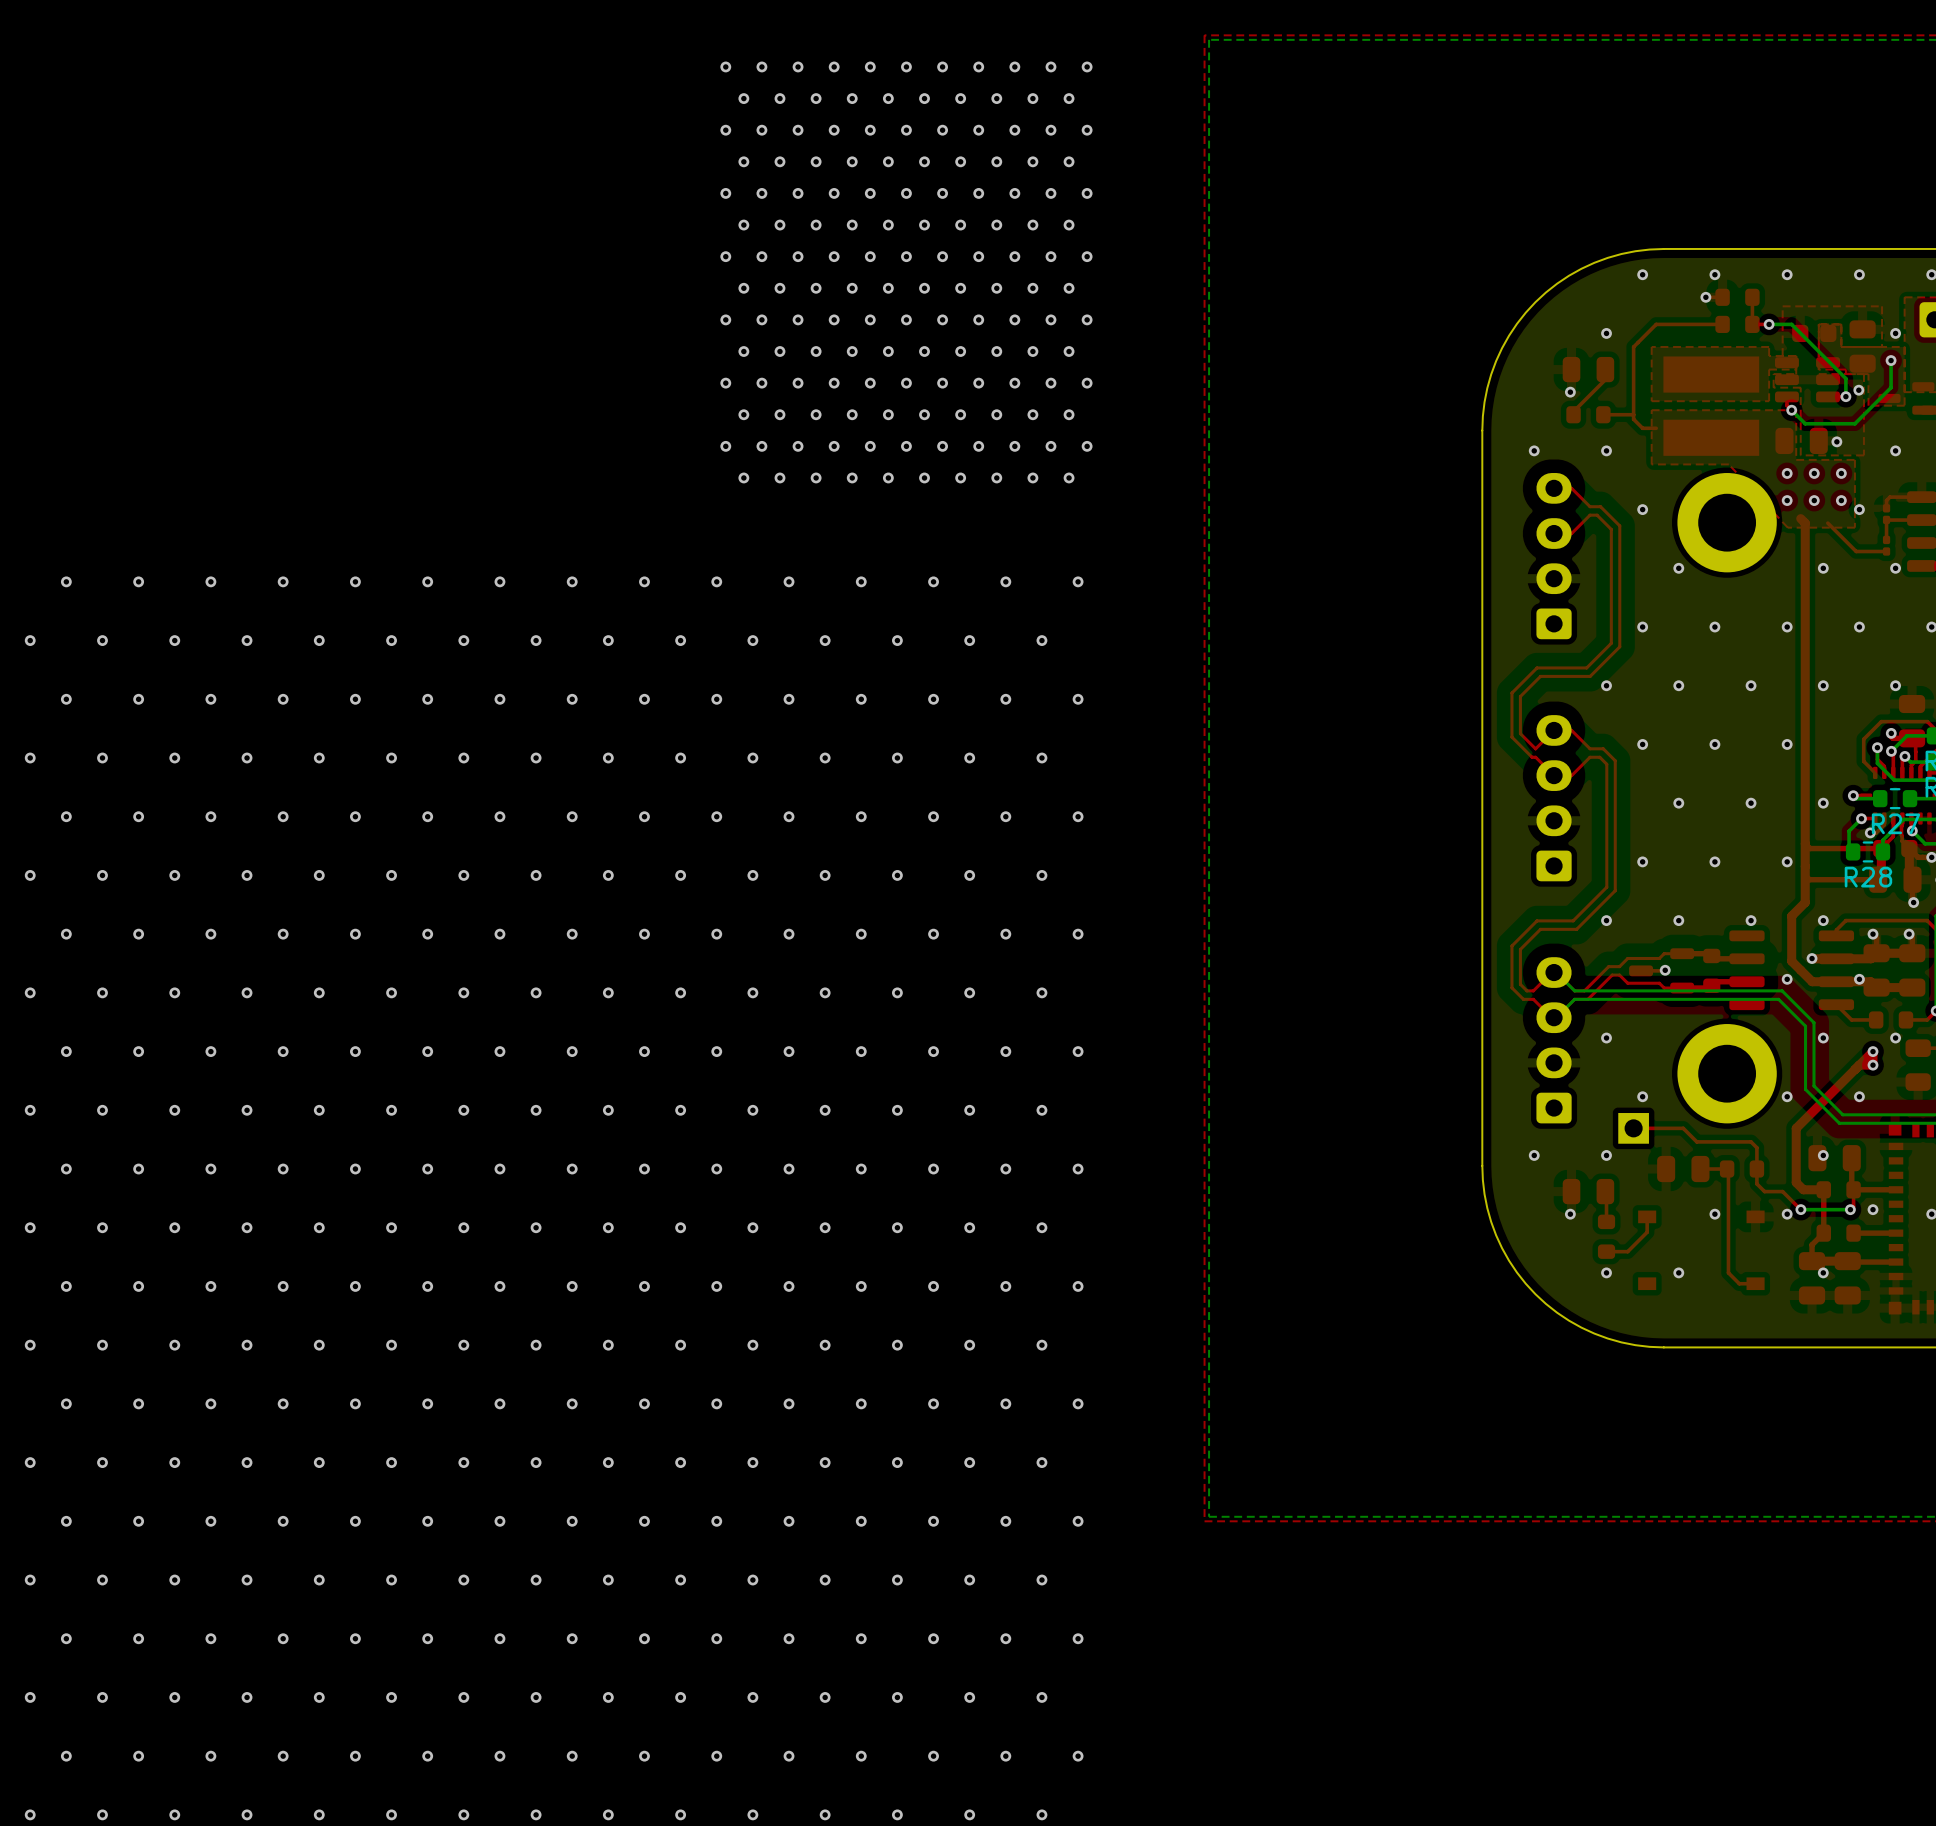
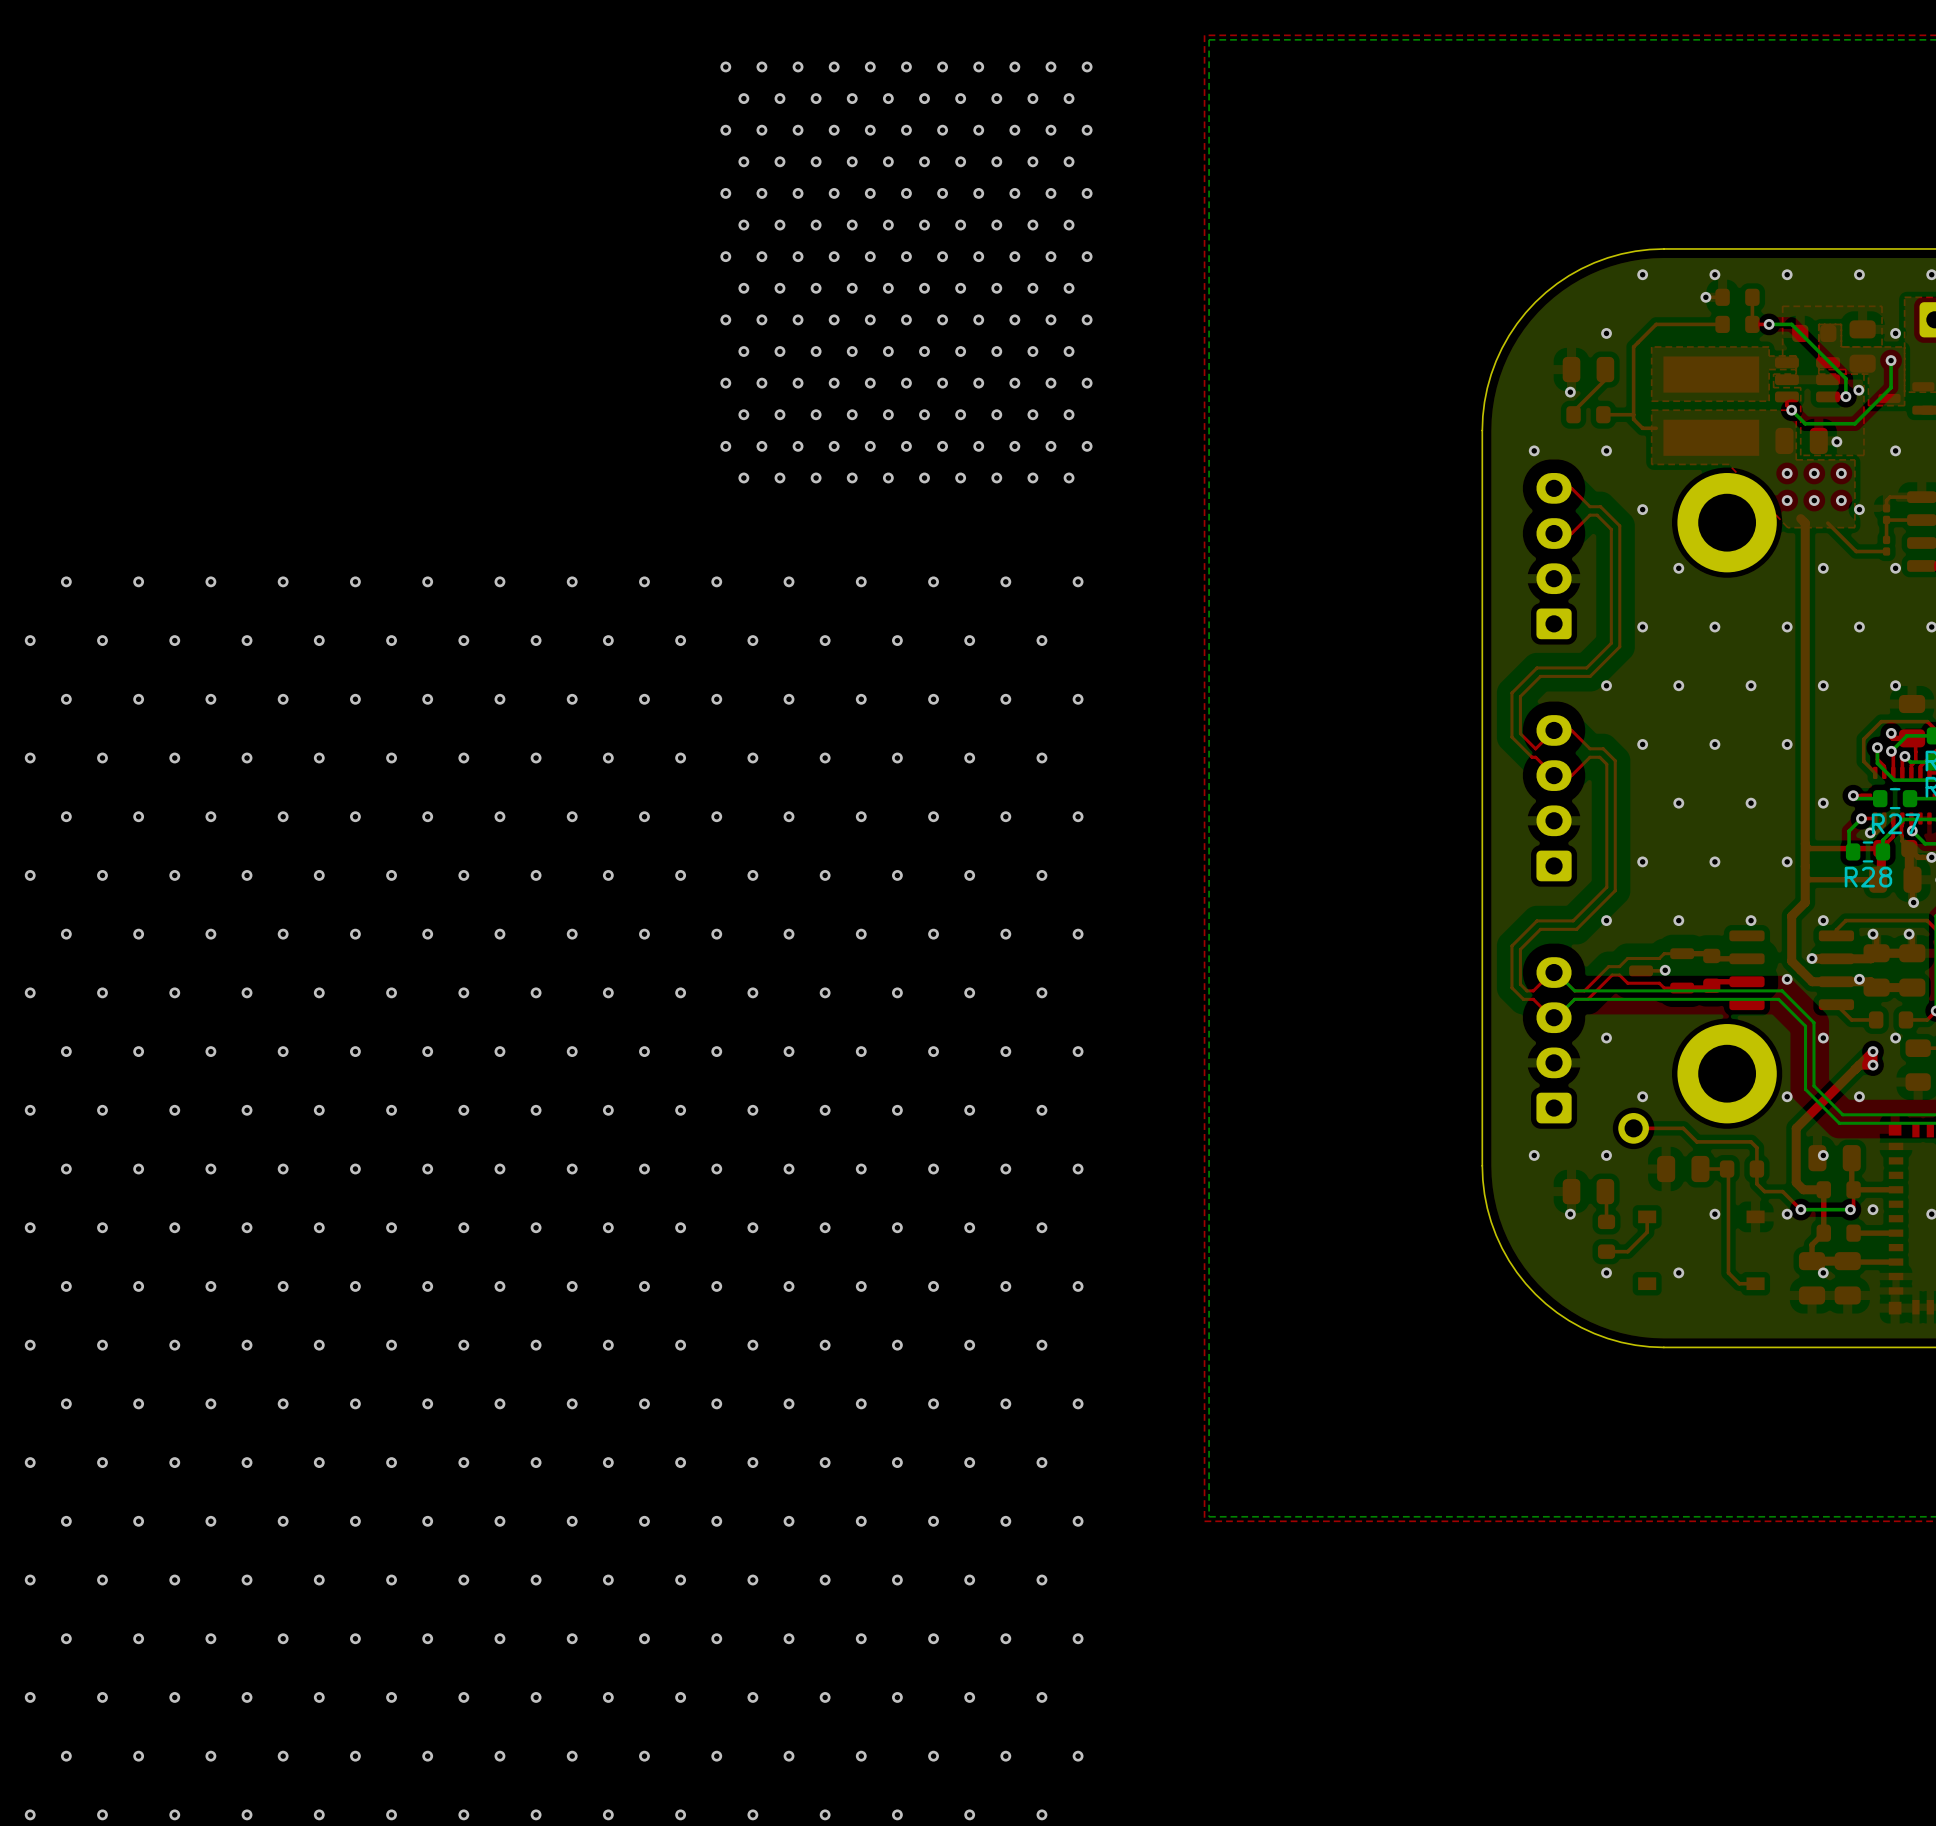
part footprint: [1618, 1113, 1649, 1144] -> [1618, 1113, 1649, 1144]

